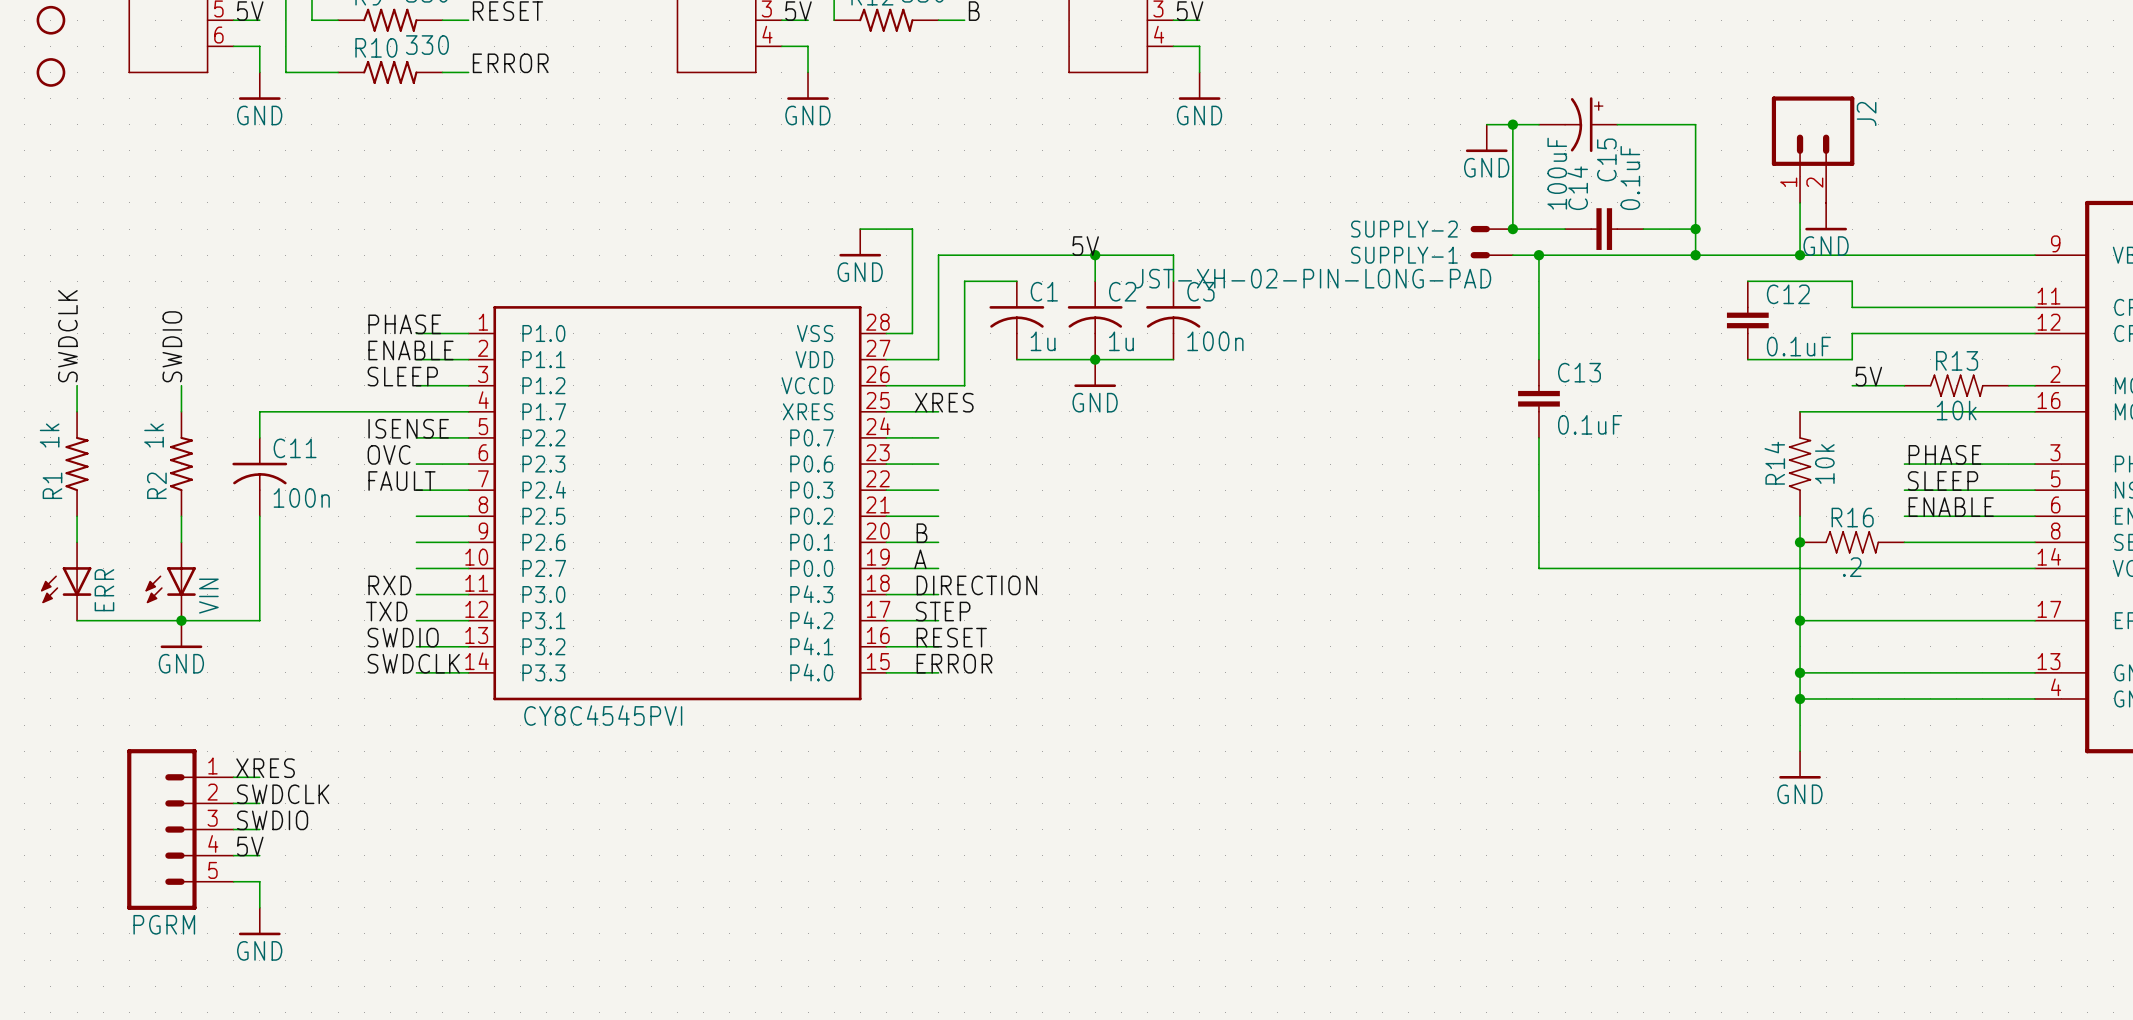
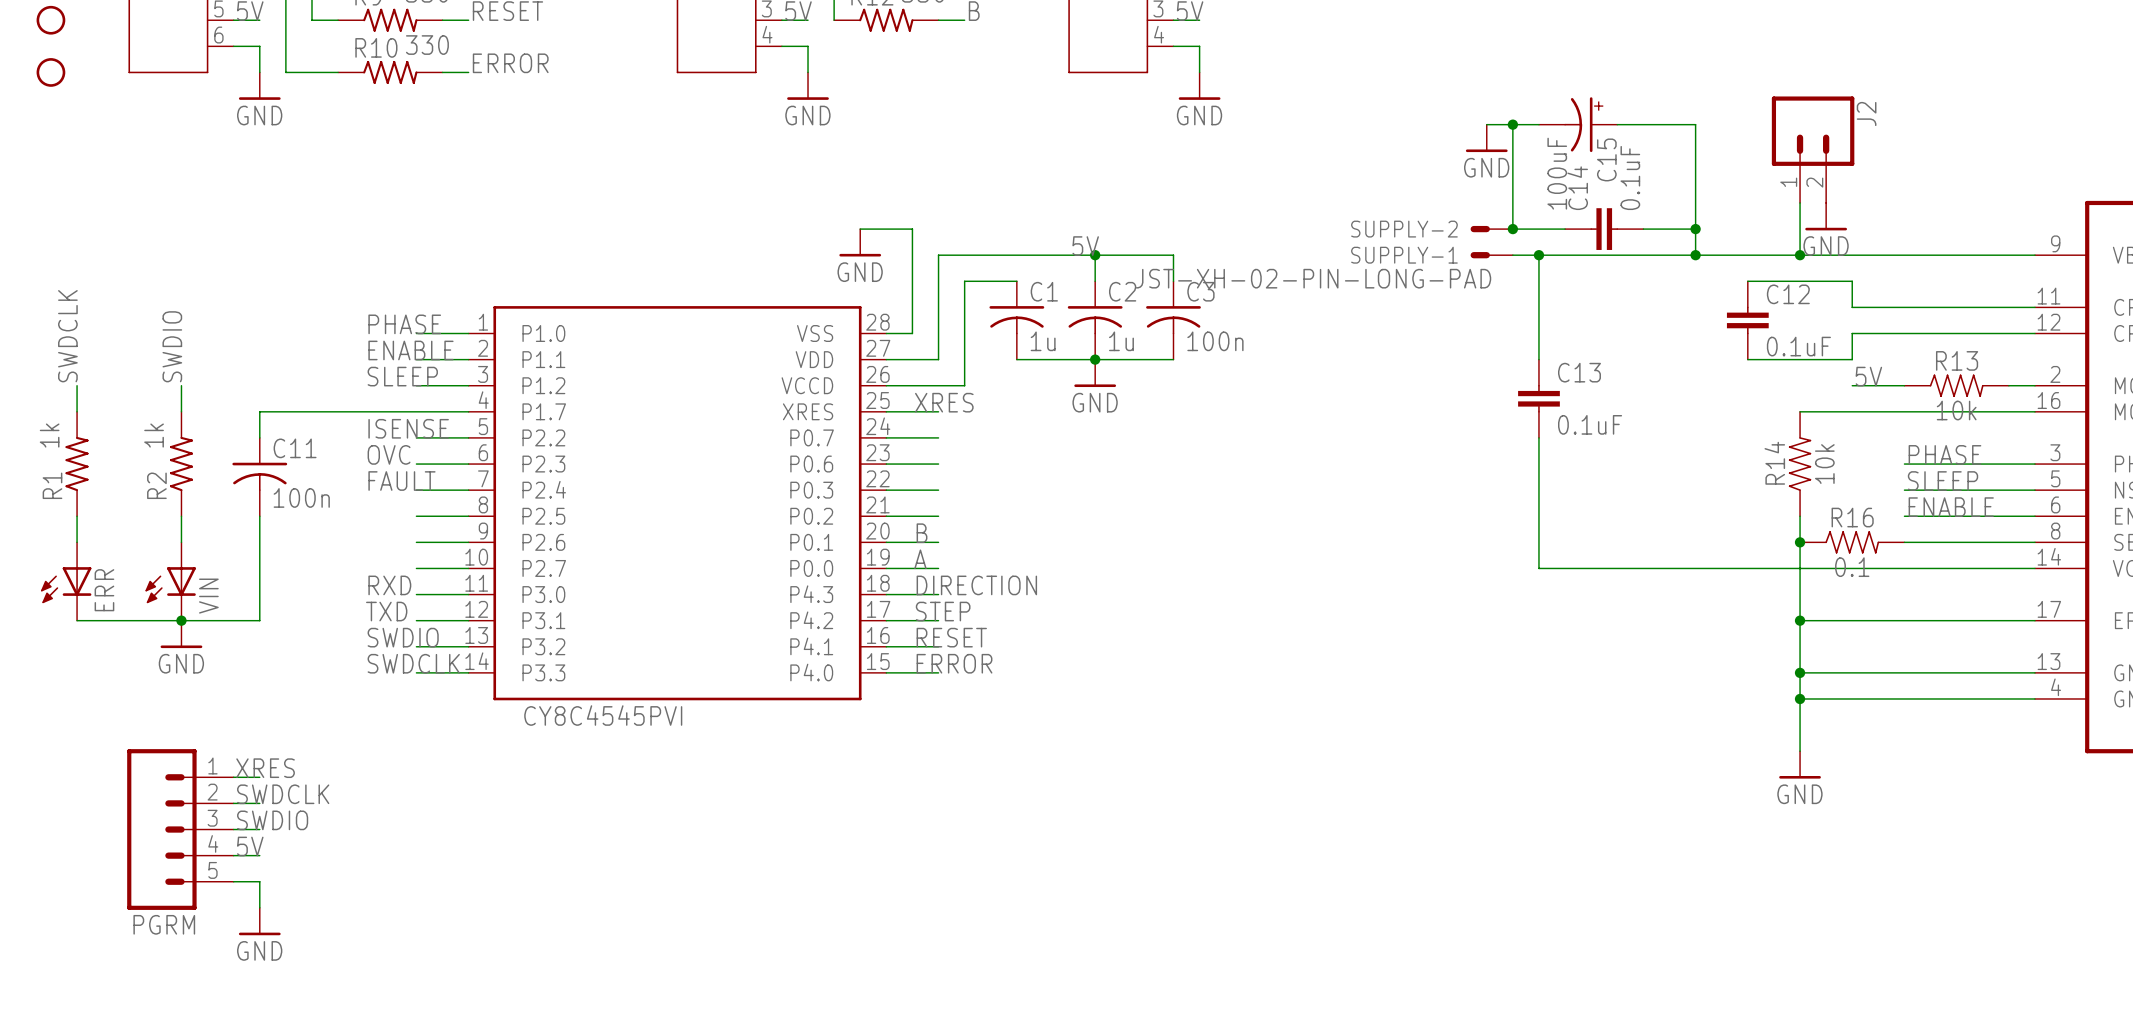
R16 value: .2 (1852, 567) -> 0.1 (1852, 567)

